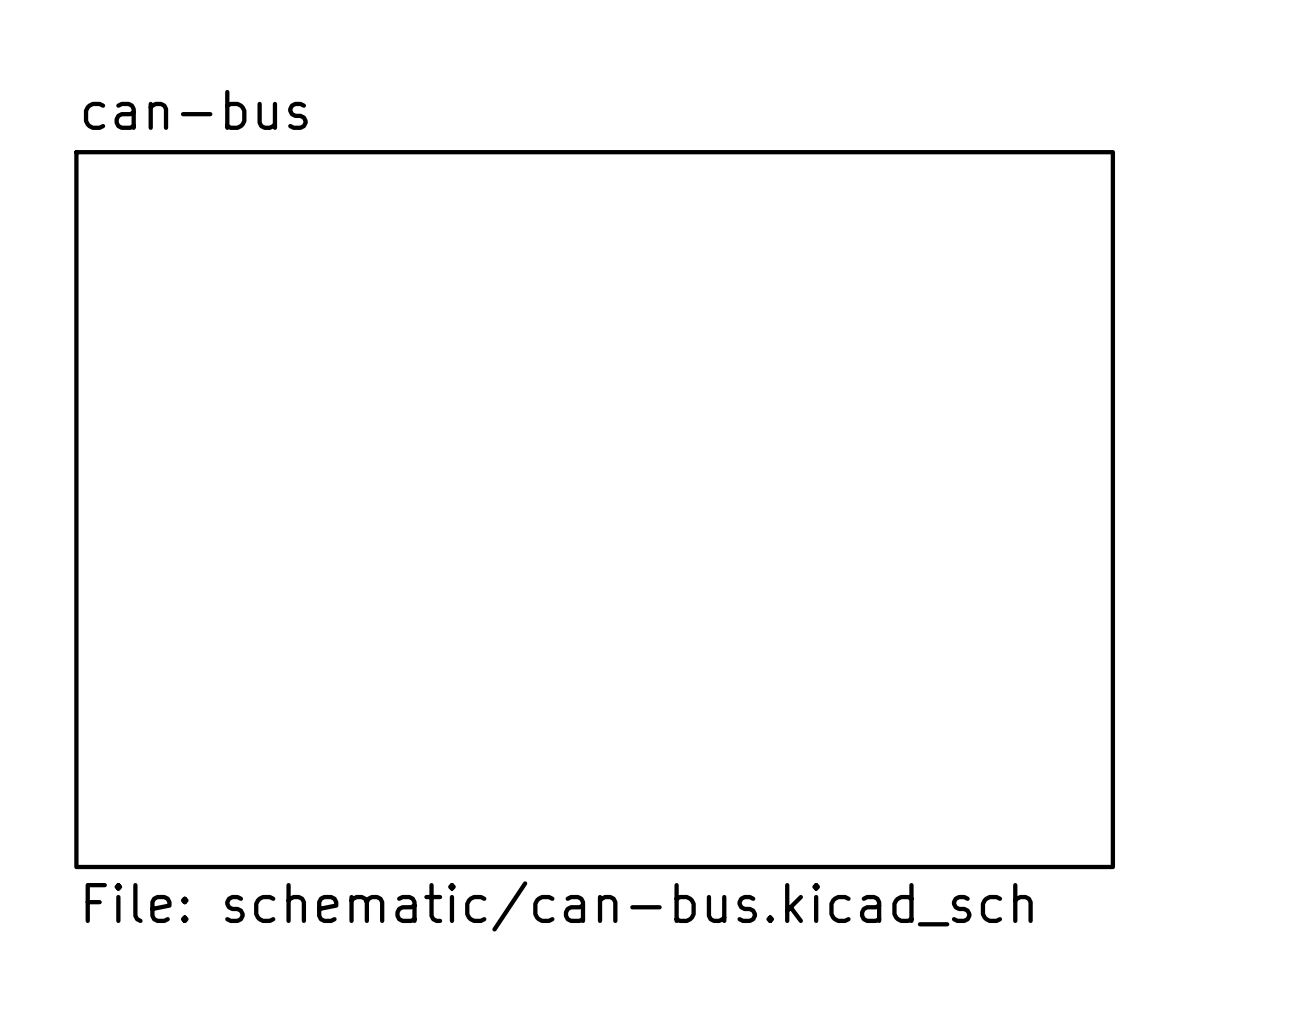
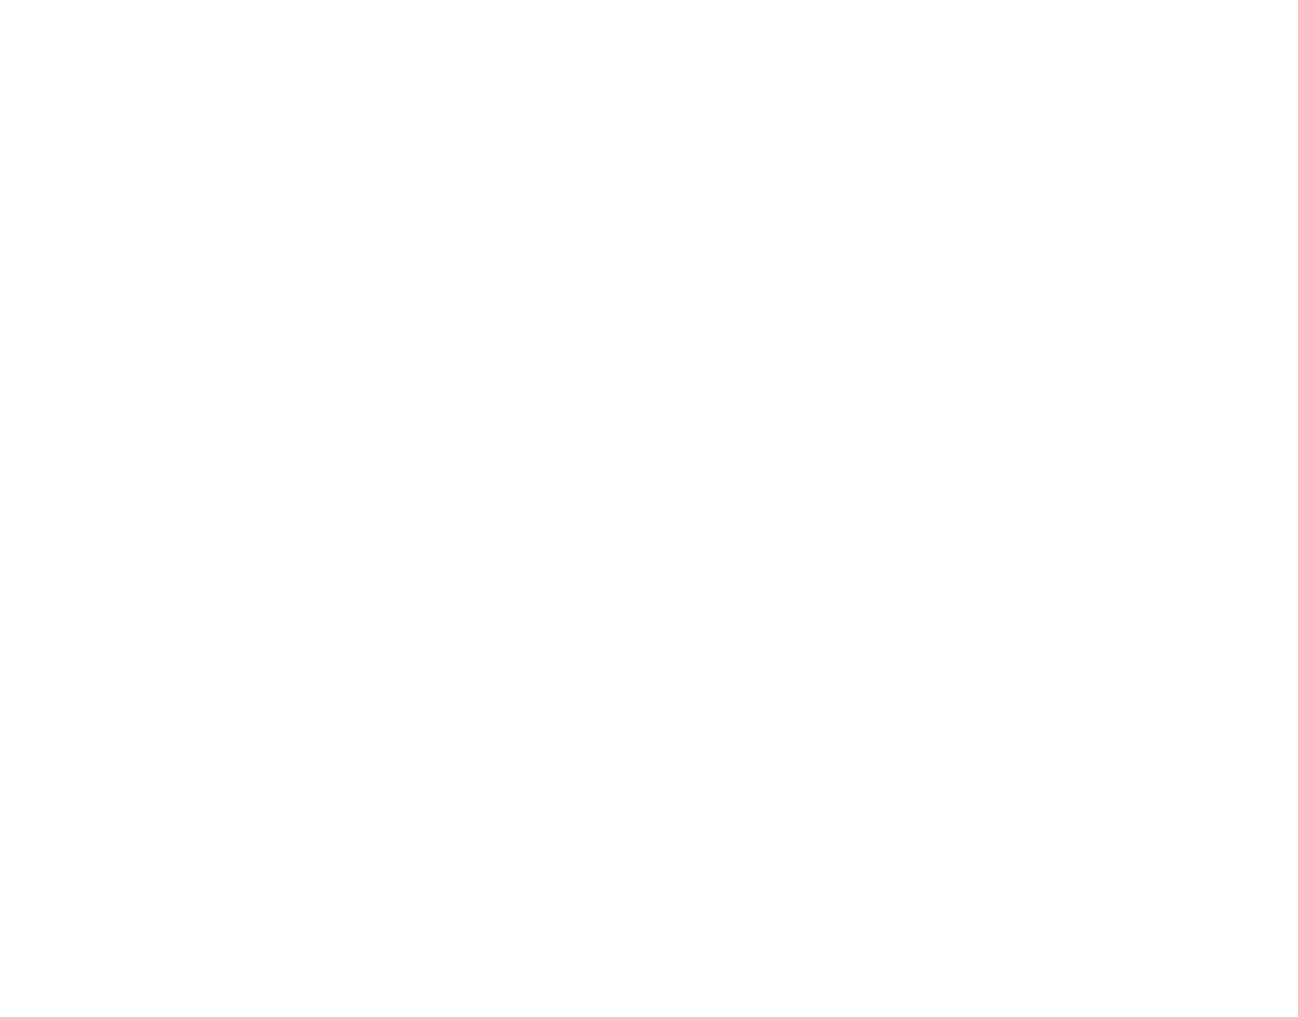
sheet can-bus: File: schematic/can-bus.kicad_sch (594, 509) -> none

